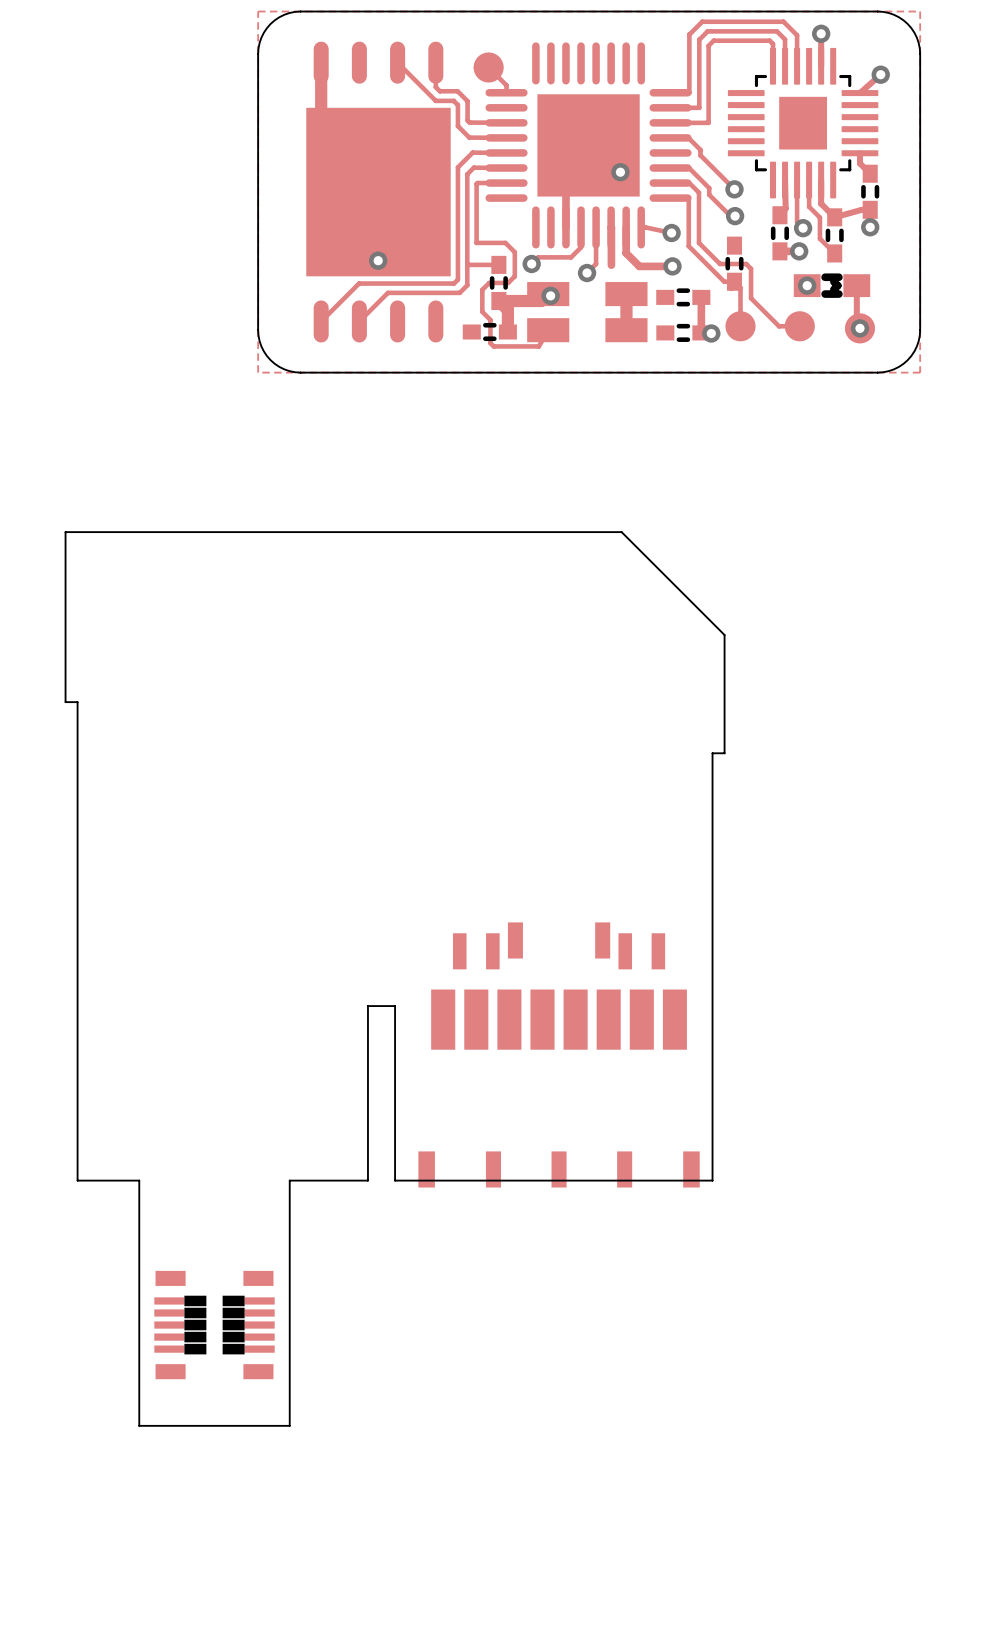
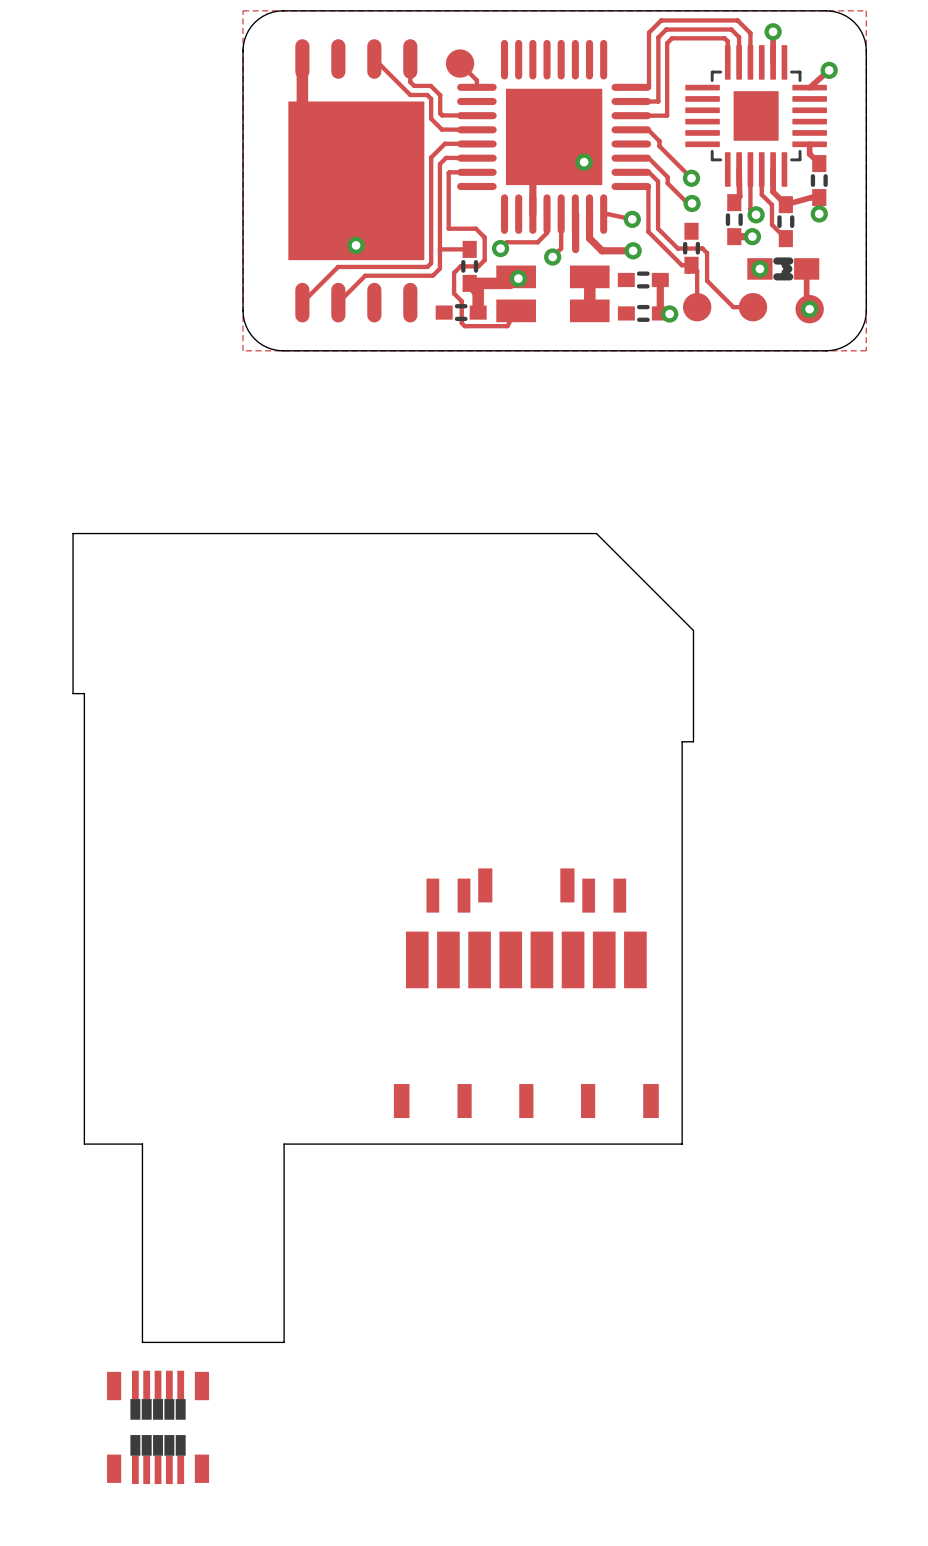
board edge: (77, 702) (65, 702) (65, 532) (621, 532) (724, 635) (724, 753) (712, 753) (712, 1180) (395, 1180) (395, 1006) (367, 1006) (367, 1180) (289, 1180) (289, 1425) -> (73, 661) (73, 533) (596, 533) (693, 630) (693, 741) (682, 741) (682, 1144) (284, 1144) (284, 1342) (272, 1342)
board edge: (77, 736) (77, 1180) (139, 1180) (139, 1425) (151, 1425) -> (73, 693) (84, 693) (84, 1144) (142, 1144) (142, 1342)
part rotation: 0° (214, 1325) -> 90° clockwise (158, 1427)
part position: (214, 1325) -> (158, 1427)

